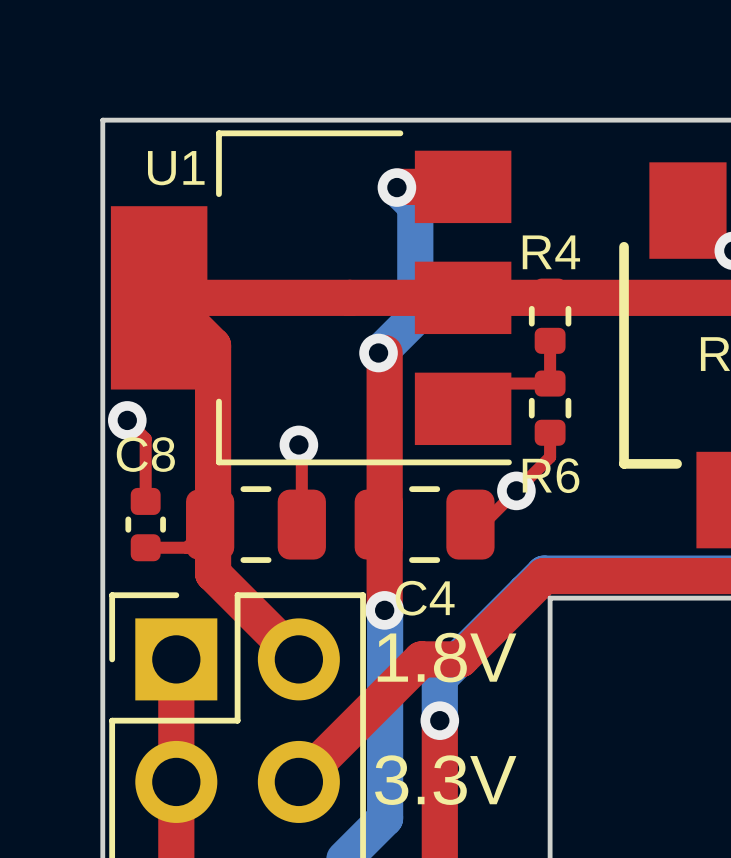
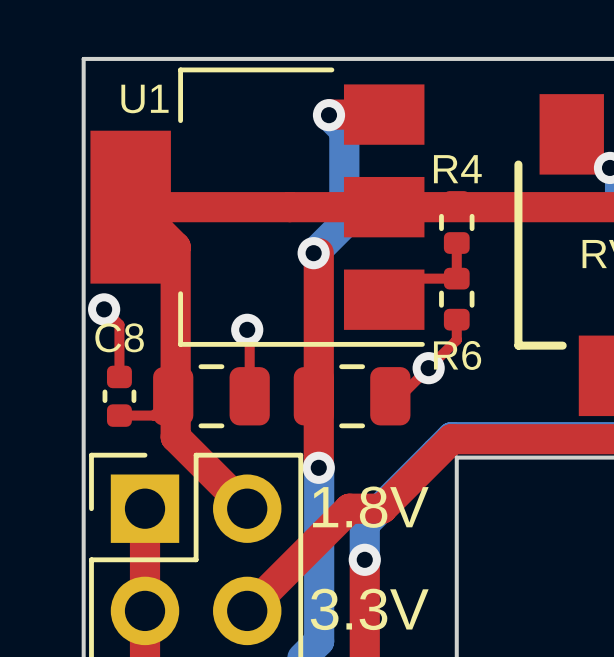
C4 name: C4 (425, 598) -> none

